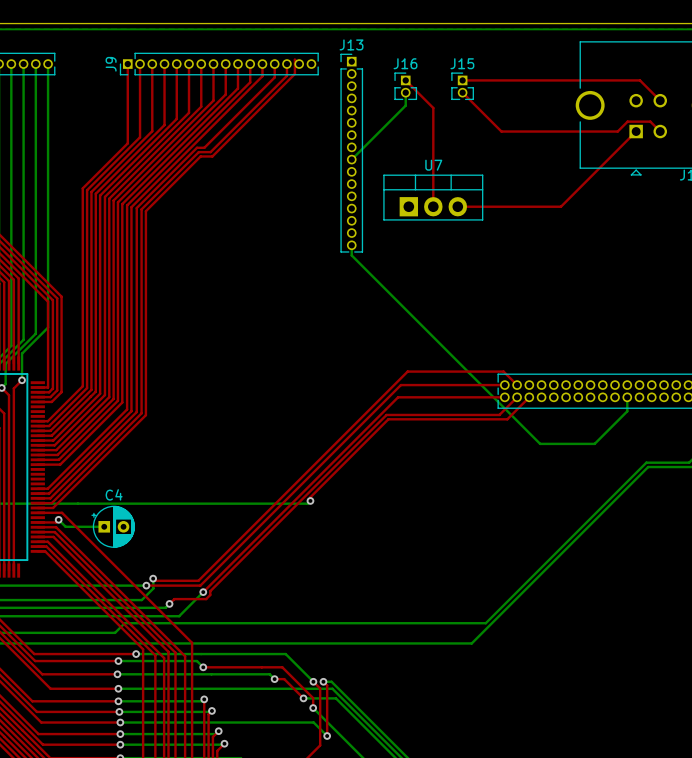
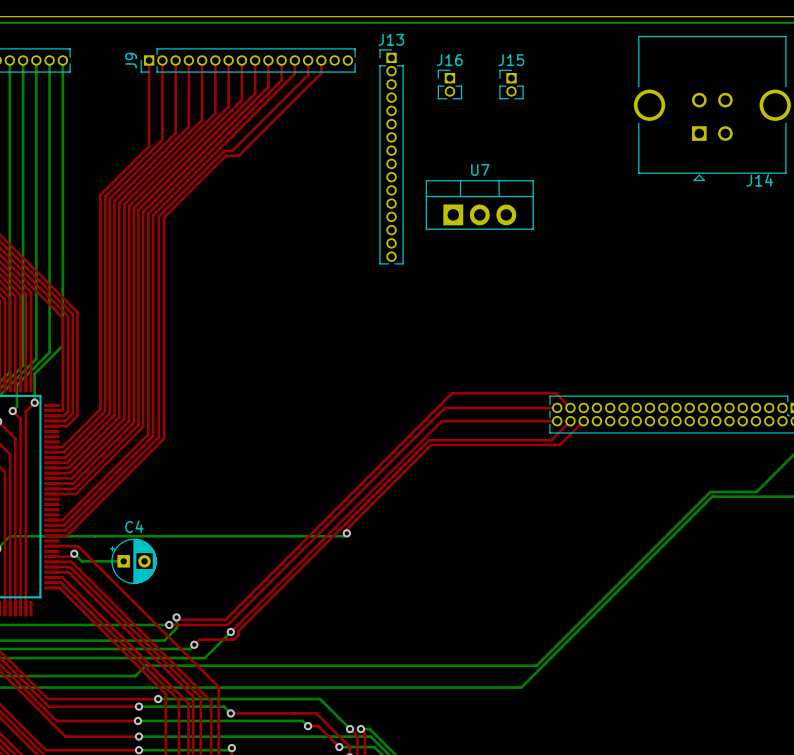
top track: (299, 64) (294, 59) (294, 73) (212, 156) (200, 156) (145, 211) (145, 415) (53, 508) (37, 508) -> none
top track: (405, 80) (433, 108) (433, 206) -> none
top track: (462, 80) (640, 80) (660, 100) -> none
bottom track: (405, 92) (405, 105) (351, 159) -> none
top track: (462, 92) (501, 131) (617, 131) (627, 121) (650, 121) (660, 131) -> none
top track: (636, 131) (560, 206) (457, 206) -> none
bottom track: (351, 245) (351, 255) (540, 443) (594, 443) (627, 411) (627, 397) -> none

